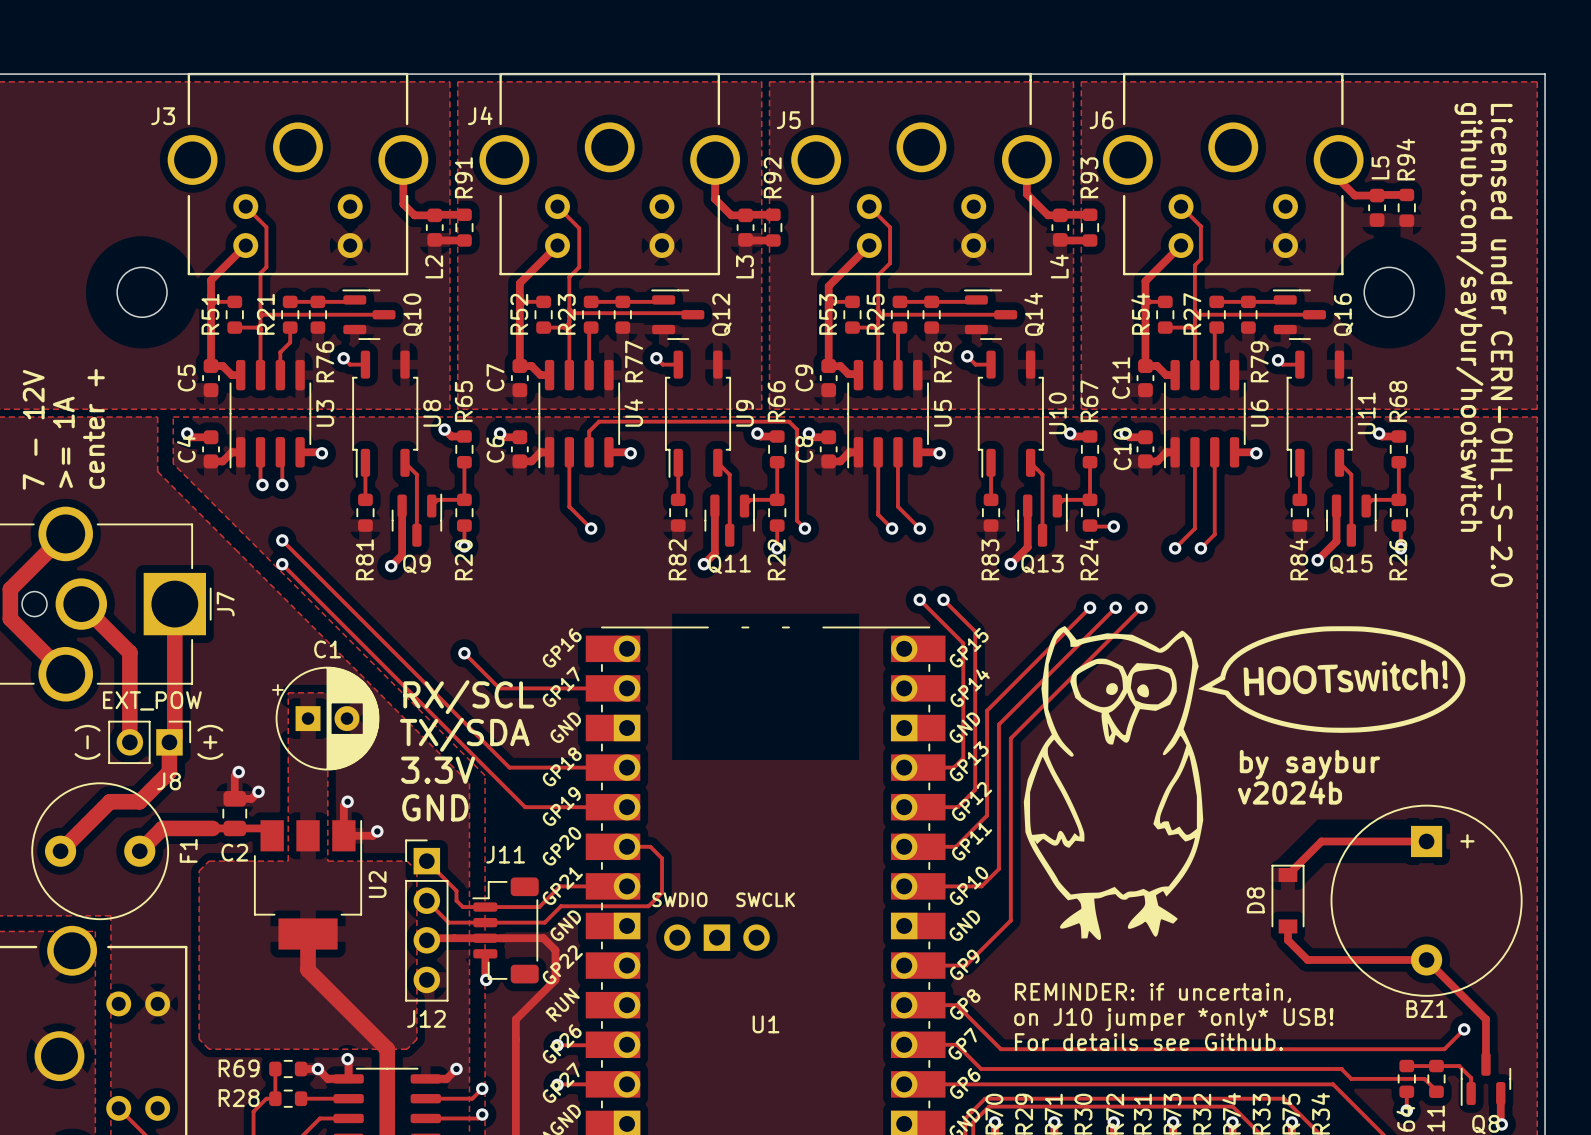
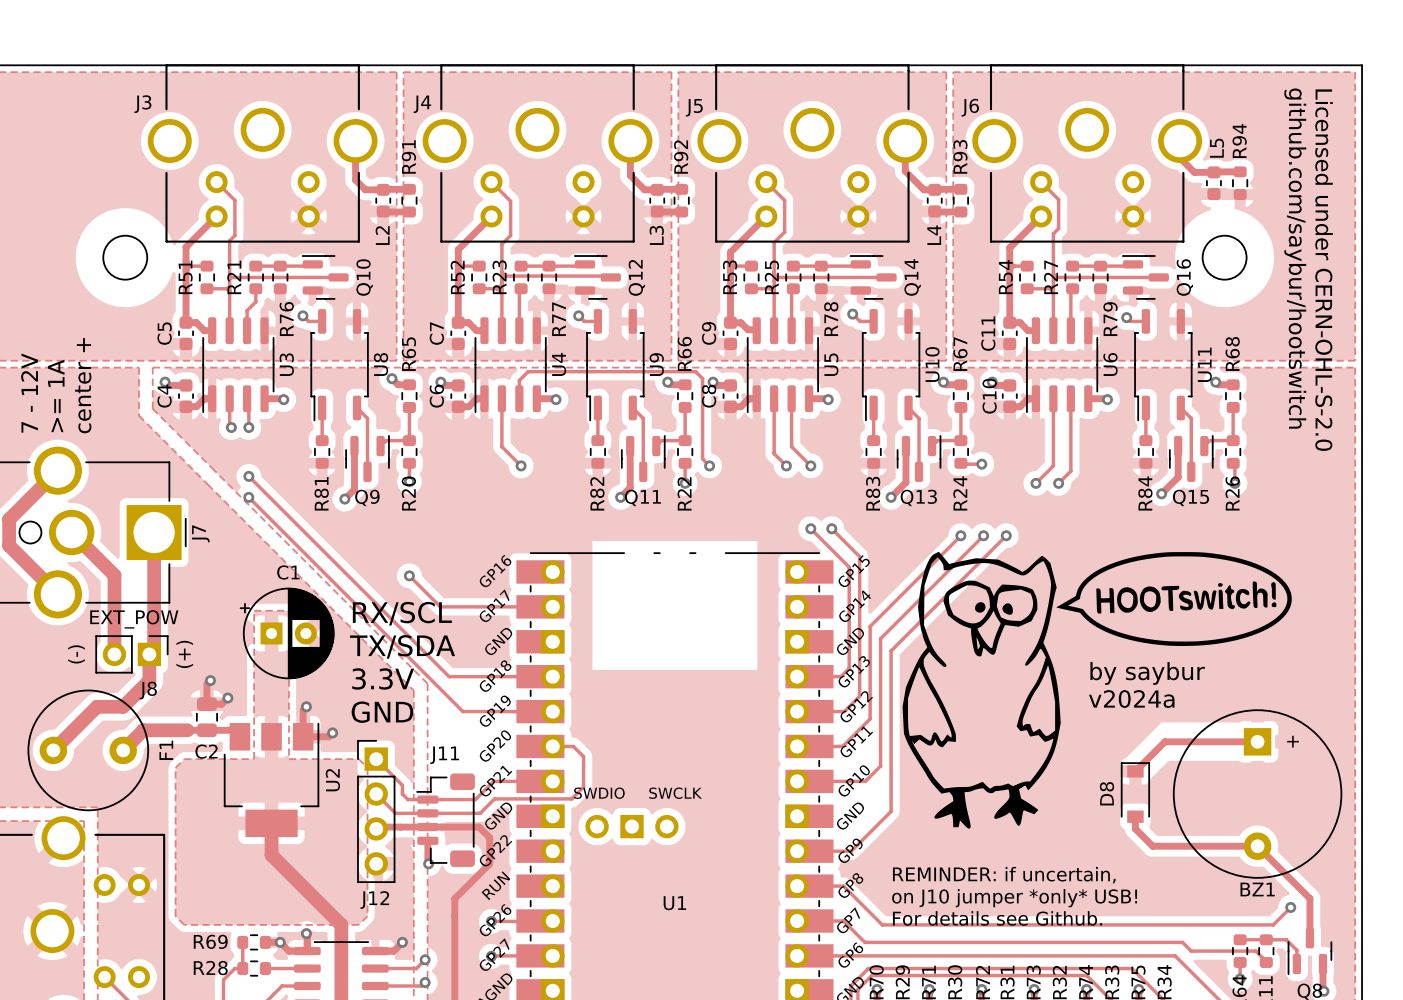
text: v2024b (1289, 792) -> v2024a (1131, 699)

